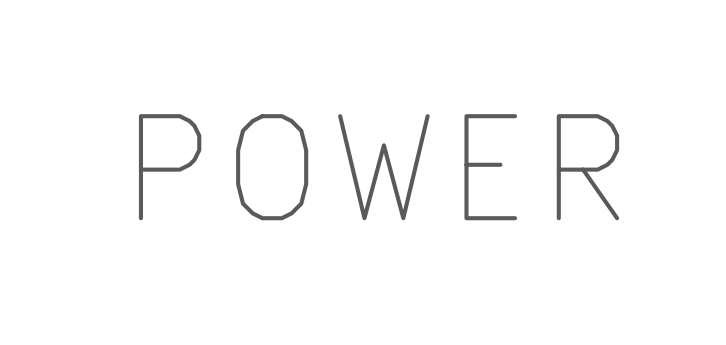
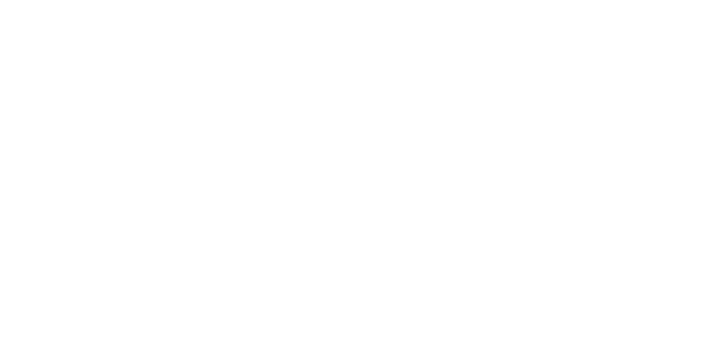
text: POWER (379, 167) -> none

